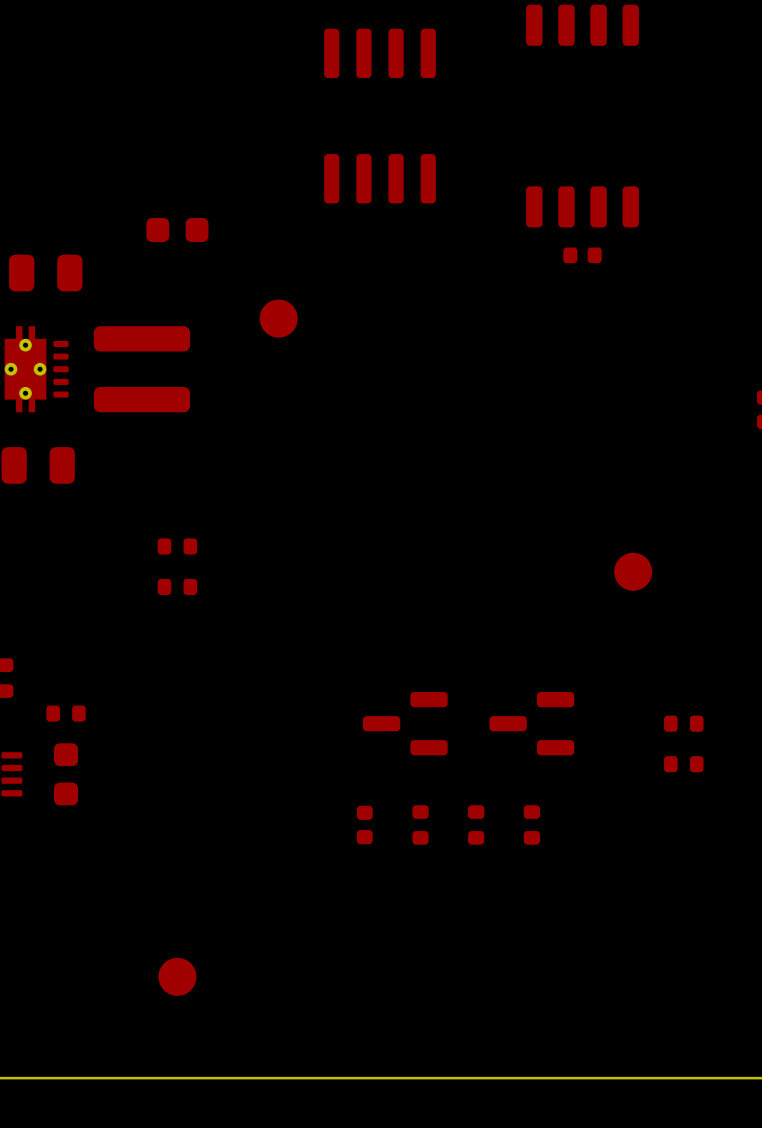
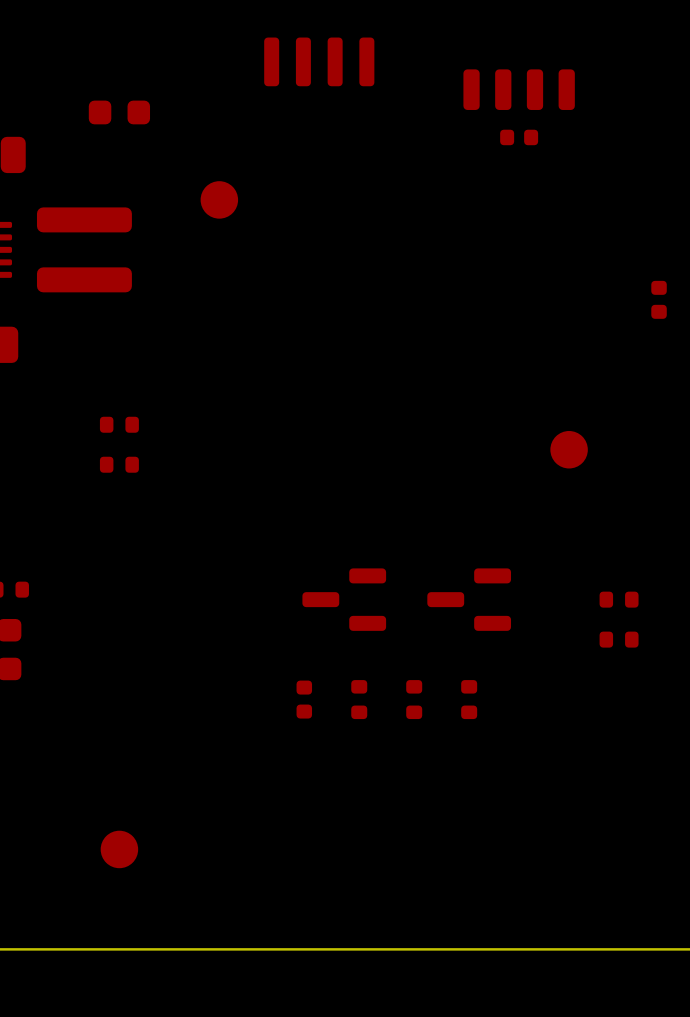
part: none -> (659, 299)

